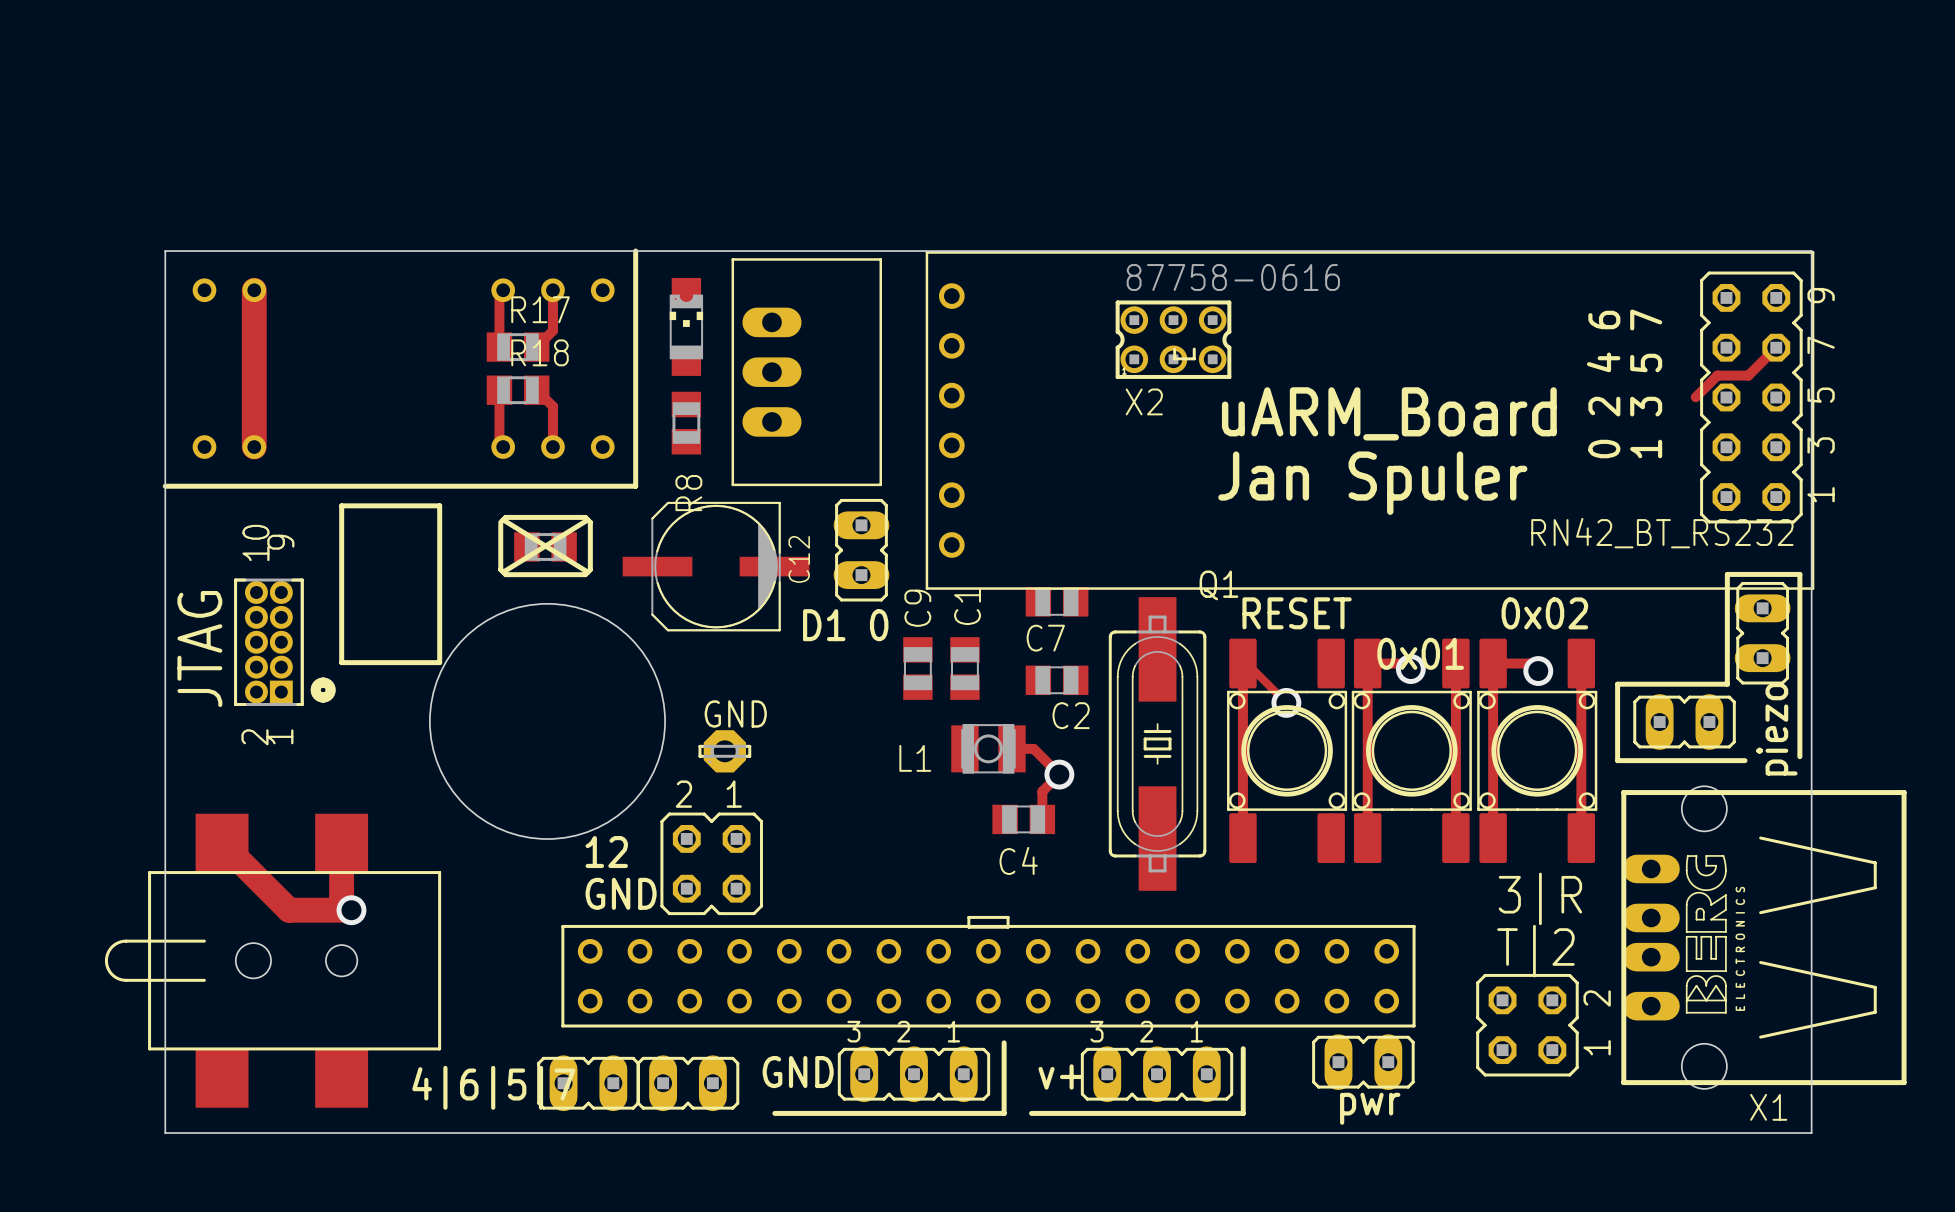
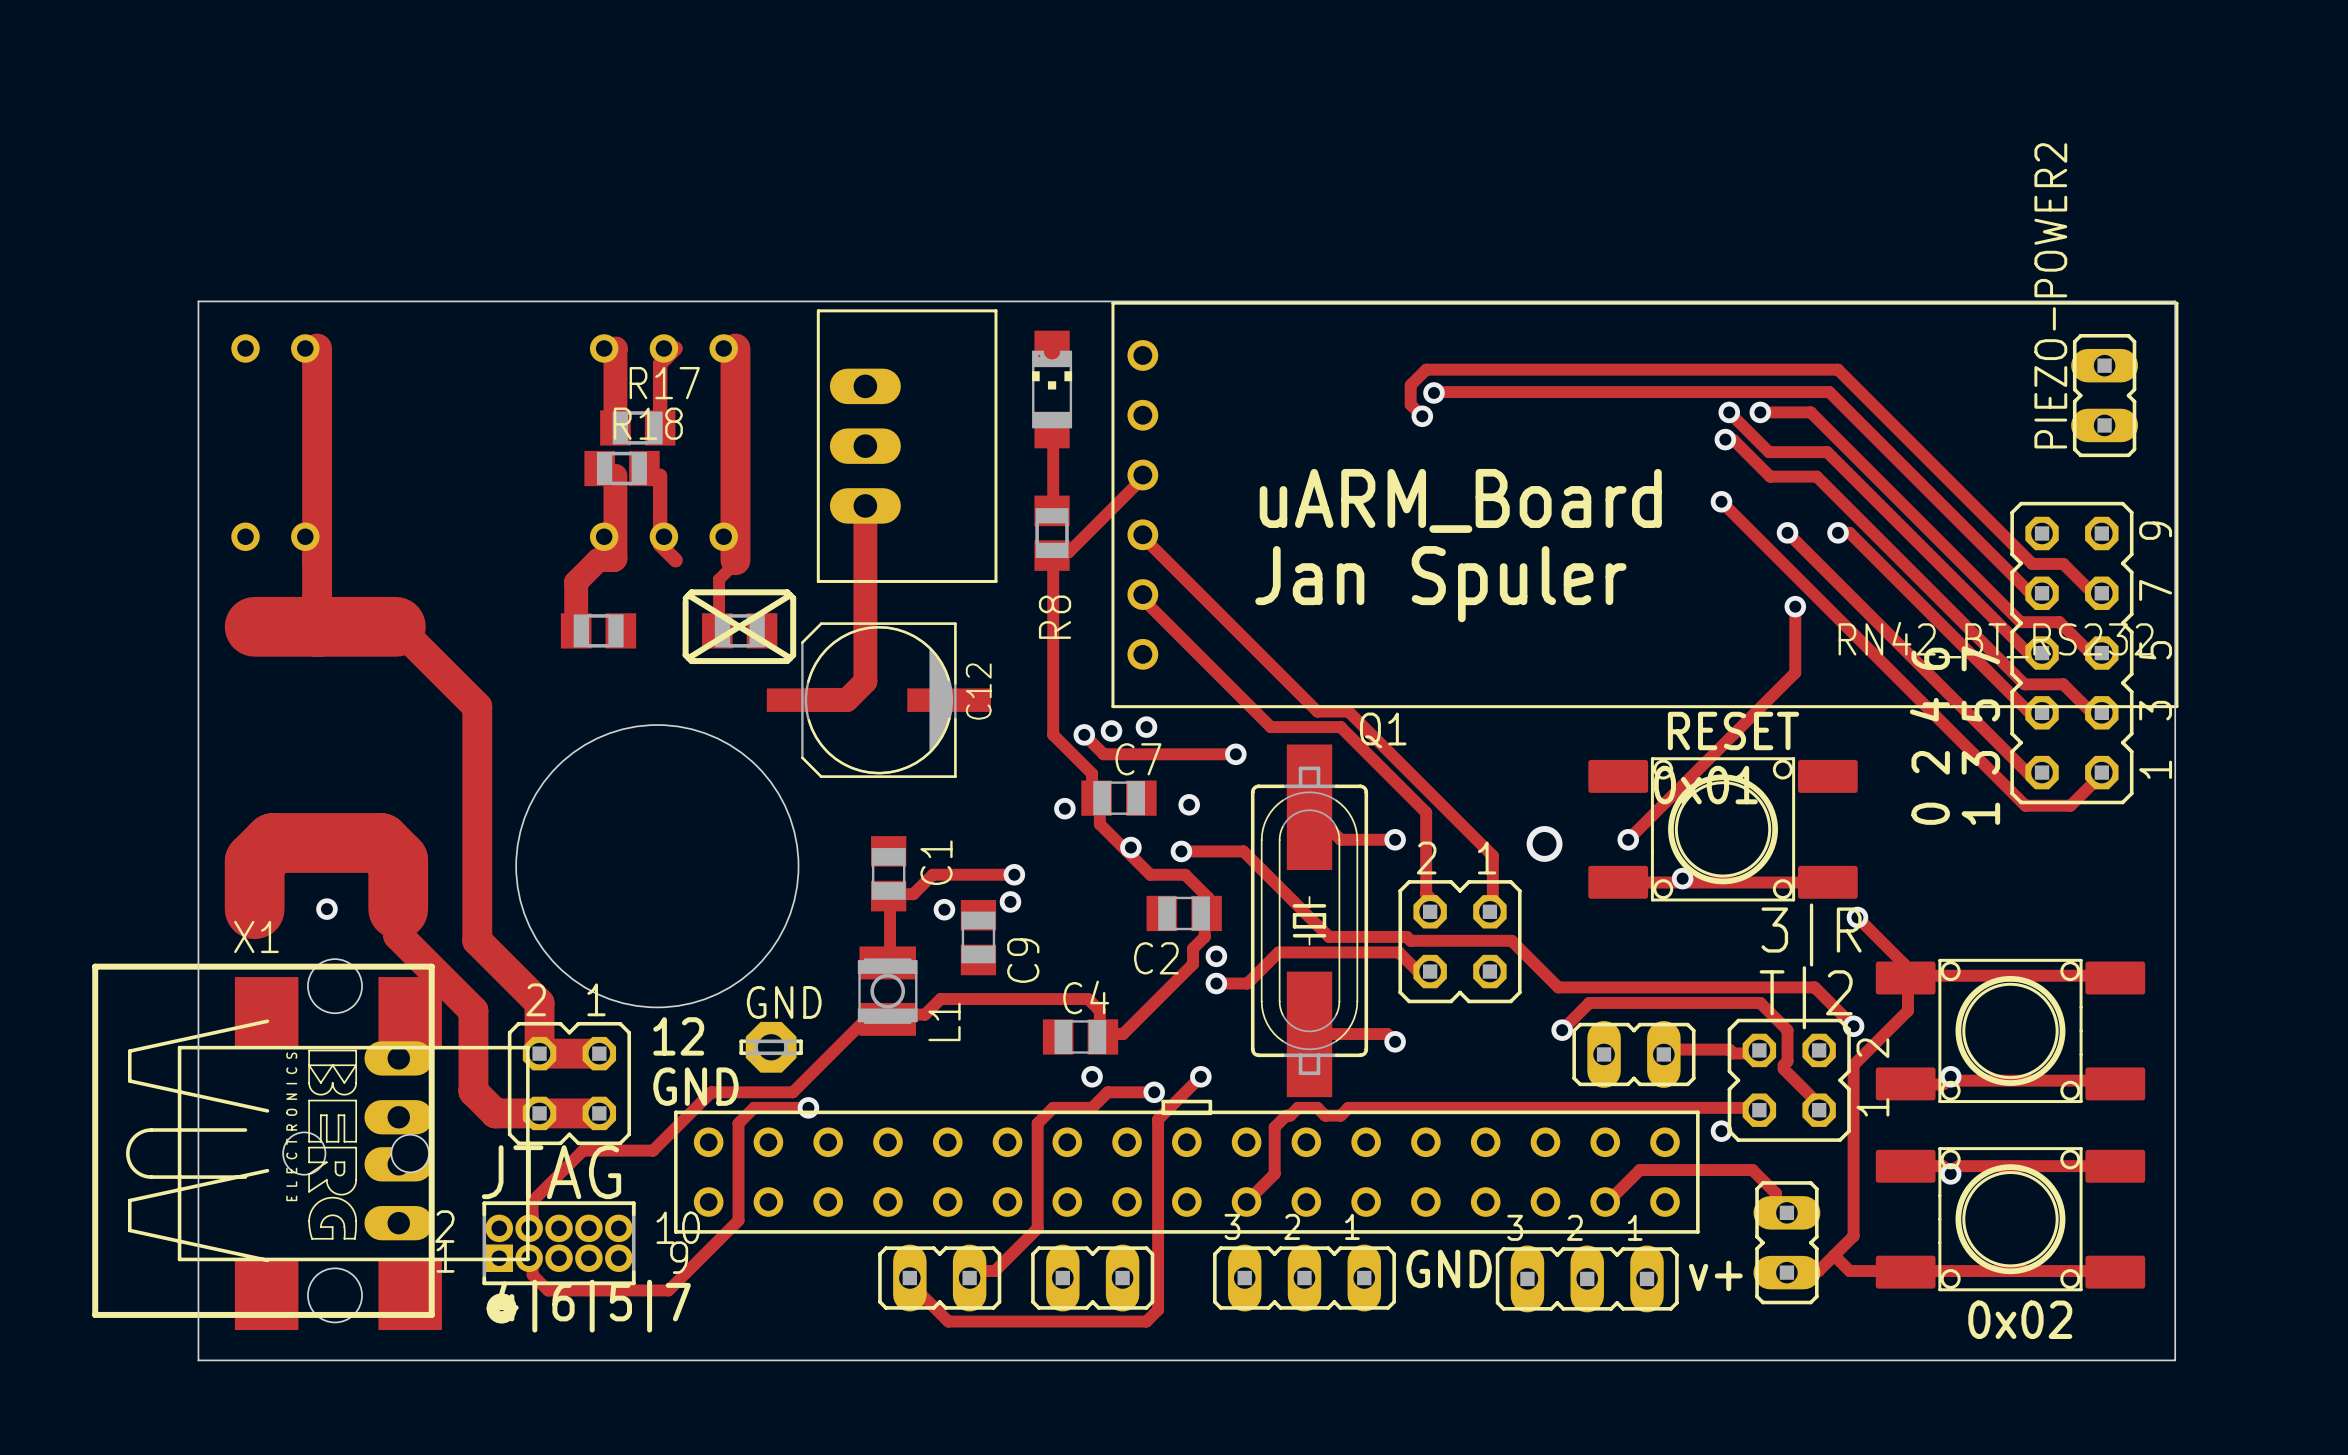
line: (635, 251) (635, 486) (165, 486) -> none
track: (254, 290) (254, 447) -> none
track: none -> (317, 348) (318, 626)
track: (503, 290) (499, 293) (499, 347) -> none
track: none -> (615, 348) (615, 427) (618, 427)
track: (552, 290) (552, 330) (536, 347) -> none
track: none -> (675, 348) (660, 364) (660, 427)
track: none -> (735, 348) (735, 560) (719, 579) (719, 629) (717, 630)
part position: (686, 326) -> (1052, 389)
track: none -> (1433, 392) (1829, 392) (2028, 591)
via: none -> (1433, 392)
PIEZO-POWER2: none -> (2104, 395)
X2: 87758-0616 (1173, 339) -> none
track: none -> (1729, 412) (1768, 452) (1827, 452) (2028, 653) (2042, 653)
via: none -> (1729, 412)
track: none -> (1760, 412) (1810, 412) (2020, 622) (2059, 622) (2089, 652) (2101, 653)
via: none -> (1760, 412)
track: none -> (1422, 416) (1410, 404) (1410, 385) (1426, 369) (1838, 369) (2032, 563) (2063, 563) (2090, 591) (2101, 593)
via: none -> (1422, 416)
R17 position: (518, 347) -> (637, 427)
track: (1776, 347) (1748, 375) (1717, 375) (1695, 397) -> none
line: (1174, 349) (1174, 358) (1194, 358) (1194, 349) -> none
track: none -> (1052, 430) (1052, 510)
track: none -> (1725, 439) (1733, 439) (1770, 476) (1816, 476) (2024, 684) (2063, 684) (2090, 711) (2101, 712)
via: none -> (1725, 439)
part position: (806, 372) -> (907, 446)
text position: 1 3 5 7 (1646, 383) -> 1 3 5 7 (1980, 735)
text position: 0 2 4 6 (1603, 384) -> 0 2 4 6 (1929, 736)
track: (499, 390) (499, 443) (503, 447) -> none
track: (536, 390) (552, 406) (552, 447) -> none
track: none -> (618, 474) (615, 475) (615, 558) (598, 560) (576, 582) (576, 630) (579, 629)
track: none -> (1140, 474) (1138, 482) (1068, 552) (1053, 552) (1052, 555) (1053, 734) (1092, 773) (1092, 797) (1099, 800) (1099, 824) (1150, 874) (1185, 874) (1208, 898) (1208, 909) (1204, 913) (1204, 936) (1193, 948) (1193, 964) (1123, 1034) (1103, 1034) (1102, 1036) (1099, 1030) (1099, 1010) (1088, 999) (940, 999) (925, 1014) (890, 1014) (886, 1022) (862, 1022) (792, 1092) (711, 1092) (653, 1150) (583, 1150) (532, 1201) (532, 1216) (528, 1220) (528, 1228)
track: none -> (660, 475) (660, 544) (675, 560)
part position: (1751, 397) -> (2071, 653)
text position: uARM_Board (1389, 413) -> uARM_Board (1460, 500)
track: none -> (1721, 501) (2025, 805) (2070, 805) (2101, 772)
via: none -> (1721, 501)
track: none -> (865, 505) (865, 681) (847, 699) (808, 699)
R8 position: (686, 423) -> (1052, 533)
track: none -> (1787, 532) (2028, 773) (2042, 772)
via: none -> (1787, 532)
track: none -> (1838, 532) (1849, 532) (2028, 711) (2042, 712)
via: none -> (1838, 532)
track: none -> (1140, 534) (1317, 711) (1348, 711) (1492, 855) (1492, 908) (1489, 911)
text position: Jan Spuler (1372, 483) -> Jan Spuler (1440, 584)
track: none -> (1140, 593) (1142, 595) (1142, 598) (1270, 727) (1340, 727) (1426, 812) (1426, 894) (1430, 898) (1430, 911)
line: (341, 505) (341, 662) (439, 662) (439, 505) (341, 505) -> none
track: none -> (1795, 606) (1795, 672) (1628, 839)
via: none -> (1795, 606)
line: (503, 519) (587, 572) -> (688, 595) (790, 658)
line: (587, 519) (503, 572) -> (790, 595) (688, 658)
track: none -> (396, 626) (477, 706) (477, 940) (539, 1003) (539, 1053) (599, 1053)
track: none -> (396, 626) (254, 626)
line: (500, 522) (505, 517) (585, 517) (590, 522) (590, 569) (585, 574) (505, 574) (500, 569) (500, 524) -> (685, 598) (691, 592) (787, 592) (793, 598) (793, 655) (787, 661) (691, 661) (685, 655) (685, 601)
part: none -> (598, 630)
part: none -> (739, 630)
part: (545, 546) -> none
part: (861, 550) -> none
C12 position: (716, 566) -> (878, 700)
C7 position: (1057, 601) -> (1118, 798)
via: none -> (1146, 727)
C1 name position: C1 (967, 606) -> C1 (936, 862)
C9 name position: C9 (917, 608) -> C9 (1023, 960)
via: none -> (1111, 730)
track: none -> (1084, 734) (1103, 754) (1235, 754)
via: none -> (1084, 734)
text position: RESET (1297, 613) -> RESET (1733, 730)
text: 0x02 (1544, 613) -> none
text: D1 0 (845, 625) -> none
via: none -> (1235, 754)
part: (1762, 633) -> none
C7 name position: C7 (1045, 638) -> C7 (1138, 759)
JTAG rotation: 0° (284, 642) -> 90° clockwise (559, 1262)
JTAG position: (284, 642) -> (559, 1262)
track: (1455, 663) (1455, 838) -> none
track: (1581, 663) (1581, 838) -> none
C9 position: (917, 668) -> (978, 937)
C1 position: (964, 668) -> (888, 873)
track: (1410, 669) (1405, 663) (1367, 663) (1367, 838) -> none
via: (1410, 669) -> none
via: none -> (1189, 804)
track: (1538, 671) (1530, 663) (1493, 663) (1493, 838) -> none
via: (1538, 671) -> none
track: none -> (1309, 807) (1340, 839) (1395, 839)
via: none -> (1064, 808)
C2 position: (1057, 680) -> (1184, 913)
part: none -> (1723, 829)
via: none -> (1395, 839)
via: none -> (1628, 839)
track: (1286, 702) (1247, 663) (1242, 663) (1242, 838) -> none
via: none -> (1130, 847)
track: none -> (1181, 851) (1243, 851) (1329, 936) (1406, 936) (1410, 940) (1511, 940) (1558, 987) (1814, 987) (1853, 1026)
via: none -> (1181, 851)
C2 name position: C2 (1071, 715) -> C2 (1156, 958)
part: (1684, 722) -> none
track: none -> (1014, 874) (932, 874) (913, 894) (893, 894) (888, 896) (890, 960) (887, 962)
via: none -> (1014, 874)
text: piezo (1776, 729) -> none
via: none -> (1682, 878)
track: none -> (1618, 882) (1827, 882)
Q1 position: (1157, 743) -> (1309, 920)
L1 rotation: 0° (988, 748) -> 90° clockwise (887, 991)
L1 position: (988, 748) -> (887, 991)
track: (1011, 748) (1033, 748) (1059, 774) (1042, 791) (1042, 819) -> none
part: (1287, 750) -> none
part: (1411, 750) -> none
part: (1537, 750) -> none
GND position: (724, 751) -> (771, 1047)
via: none -> (1010, 901)
line: (1799, 756) (1799, 574) (1727, 574) (1727, 684) (1617, 684) (1617, 760) (1744, 760) -> none
via: none -> (326, 909)
track: none -> (398, 909) (398, 935) (473, 1010) (473, 1091) (495, 1113) (599, 1113)
track: none -> (398, 909) (398, 860) (380, 842) (273, 842) (254, 861) (254, 909) (256, 909)
via: none -> (944, 909)
L1 name position: L1 (915, 758) -> L1 (944, 1022)
track: none -> (1857, 917) (1904, 964) (1905, 977)
via: none -> (1857, 917)
via: (1059, 774) -> none
part: none -> (1460, 941)
X1 footprint: [1621, 786, 1907, 1089] -> [92, 959, 435, 1323]
via: none -> (1216, 956)
track: none -> (1430, 971) (1418, 971) (1399, 952) (1278, 952) (1247, 983) (1216, 983)
track: none -> (1905, 977) (1907, 975) (2113, 975) (2115, 977)
track: none -> (1905, 977) (1907, 983) (1907, 1010) (1853, 1065) (1853, 1236) (1818, 1271) (1787, 1271) (1786, 1272)
via: none -> (1216, 983)
C4 position: (1023, 819) -> (1080, 1036)
track: (222, 843) (289, 910) (351, 910) (341, 900) (341, 843) -> none
text position: 12 (606, 852) -> 12 (678, 1036)
via: none -> (1853, 1026)
track: none -> (1562, 1030) (1589, 1002) (1760, 1002) (1787, 1030) (1787, 1061) (1783, 1065) (1783, 1069) (1822, 1107) (1819, 1110)
via: none -> (1562, 1030)
part: none -> (2010, 1030)
C4 name position: C4 (1018, 860) -> C4 (1086, 997)
track: none -> (1309, 1034) (1387, 1034) (1395, 1041)
part position: (711, 863) -> (569, 1083)
via: none -> (1395, 1041)
track: none -> (1759, 1050) (1756, 1053) (1733, 1053) (1729, 1049) (1670, 1049) (1663, 1054)
part: none -> (1633, 1054)
text position: GND (621, 893) -> GND (695, 1086)
via: none -> (1092, 1076)
track: none -> (1200, 1076) (1158, 1119) (1158, 1309) (1146, 1321) (948, 1321) (913, 1286) (913, 1278) (909, 1278)
via: none -> (1200, 1076)
via: none -> (1950, 1076)
text position: 3|R (1540, 898) -> 3|R (1811, 935)
track: none -> (1905, 1083) (1942, 1084) (1950, 1076) (1954, 1080) (2113, 1080) (2115, 1083)
track: none -> (1154, 1092) (1107, 1092) (1092, 1107) (1053, 1107) (1037, 1123) (1037, 1228) (994, 1271) (975, 1271) (969, 1278)
via: none -> (1154, 1092)
via: (351, 910) -> none
track: none -> (808, 1107) (754, 1107) (738, 1123) (738, 1220) (668, 1290) (548, 1290) (532, 1274) (532, 1259) (529, 1258)
via: none -> (808, 1107)
track: none -> (1759, 1110) (1756, 1107) (1348, 1107) (1340, 1115) (1325, 1115) (1317, 1107) (1297, 1107) (1274, 1127) (1274, 1173) (1246, 1202)
via: none -> (1721, 1131)
text position: T|2 (1535, 951) -> T|2 (1806, 997)
track: none -> (1905, 1166) (1942, 1166) (1950, 1173) (1958, 1166) (2115, 1166)
via: none -> (1950, 1173)
track: none -> (1605, 1202) (1608, 1201) (1639, 1170) (1752, 1170) (1775, 1193) (1775, 1204) (1783, 1212) (1786, 1212)
part: none -> (2010, 1219)
part position: (1527, 1025) -> (1789, 1080)
part: none -> (1786, 1242)
line: (1004, 1042) (1004, 1113) (774, 1113) -> none
track: none -> (1834, 1255) (1849, 1271) (2115, 1272)
part footprint: [837, 1046, 991, 1103] -> [1031, 1244, 1155, 1312]
line: (1243, 1048) (1243, 1113) (1031, 1113) -> none
text: none -> GND (1449, 1268)
part: (1363, 1062) -> none
part: none -> (1587, 1278)
text: GND (798, 1072) -> none
part position: (1157, 1074) -> (1304, 1278)
text position: v+ (1060, 1076) -> v+ (1715, 1275)
part: (588, 1083) -> none
part position: (688, 1083) -> (939, 1278)
text: none -> 0x02 (2020, 1319)
X1 name position: X1 (1768, 1107) -> X1 (256, 936)
text: pwr (1370, 1108) -> none

